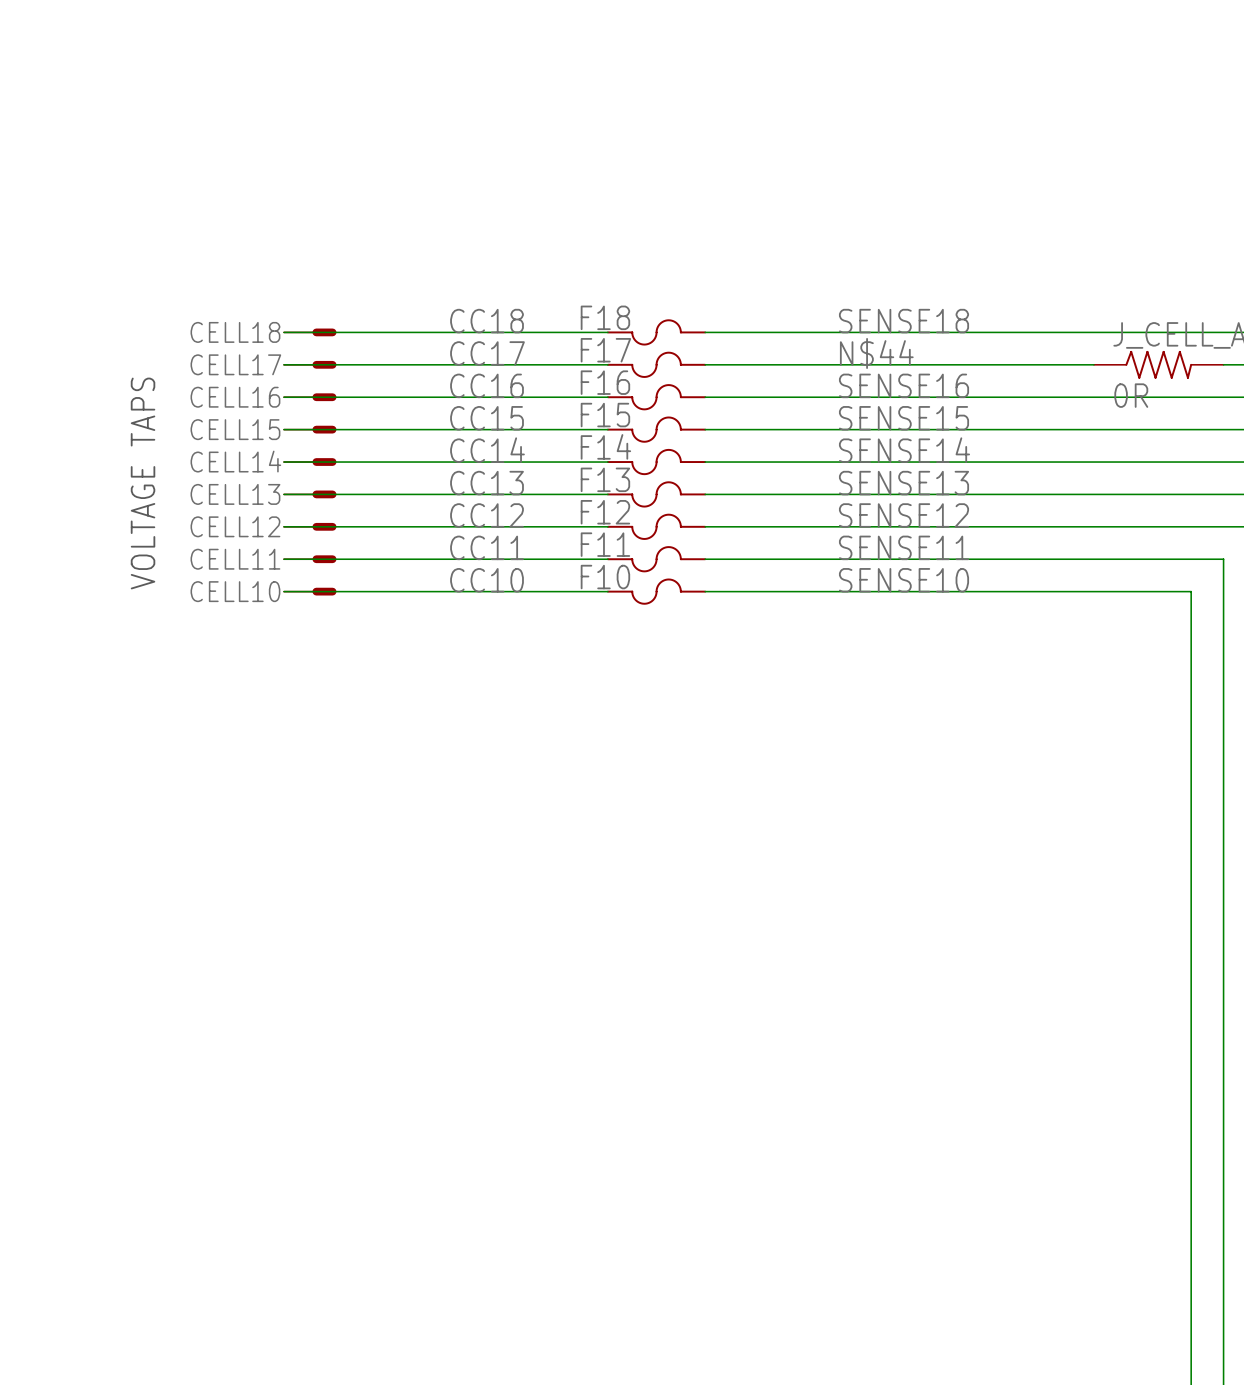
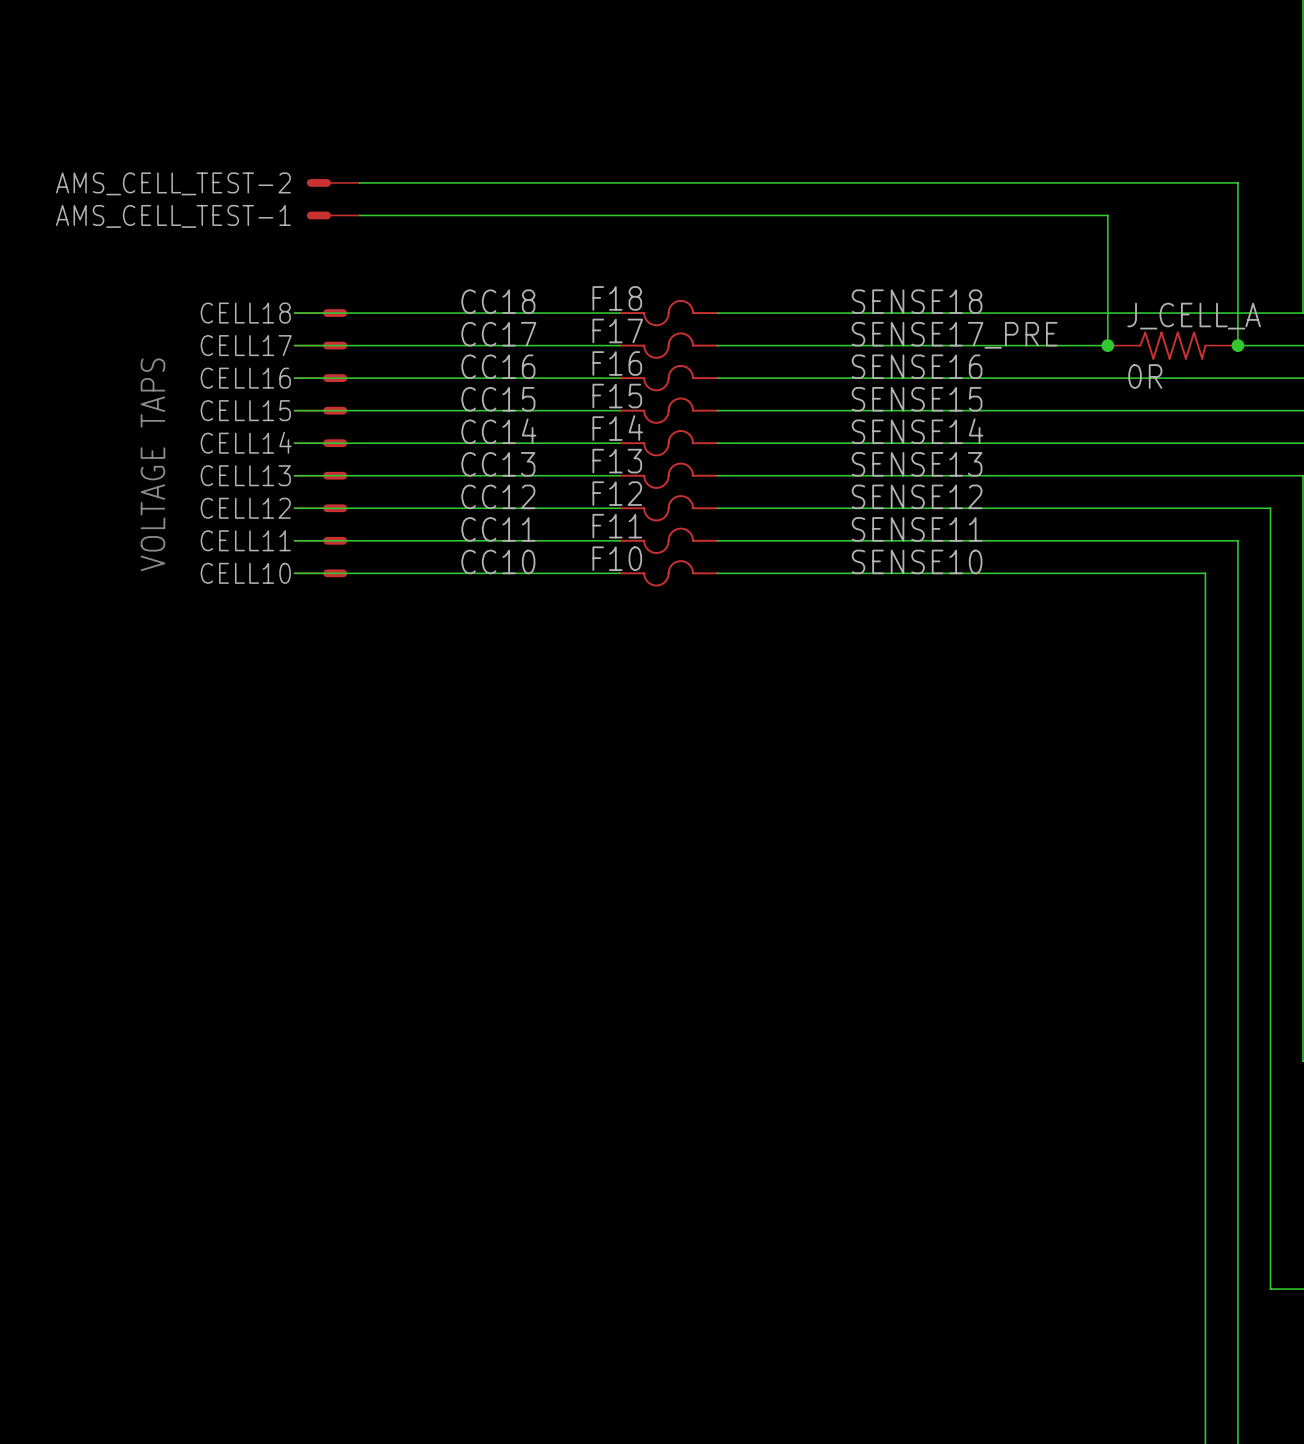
AMS_CELL_TEST-2: none -> (333, 182)
wire: none -> (359, 182) (1237, 182) (1237, 345)
AMS_CELL_TEST-1: none -> (333, 215)
wire: none -> (359, 215) (1107, 215) (1107, 345)
label: N$44 (876, 353) -> SENSE17_PRE (954, 335)
junction: none -> (1107, 345)
junction: none -> (1237, 345)

